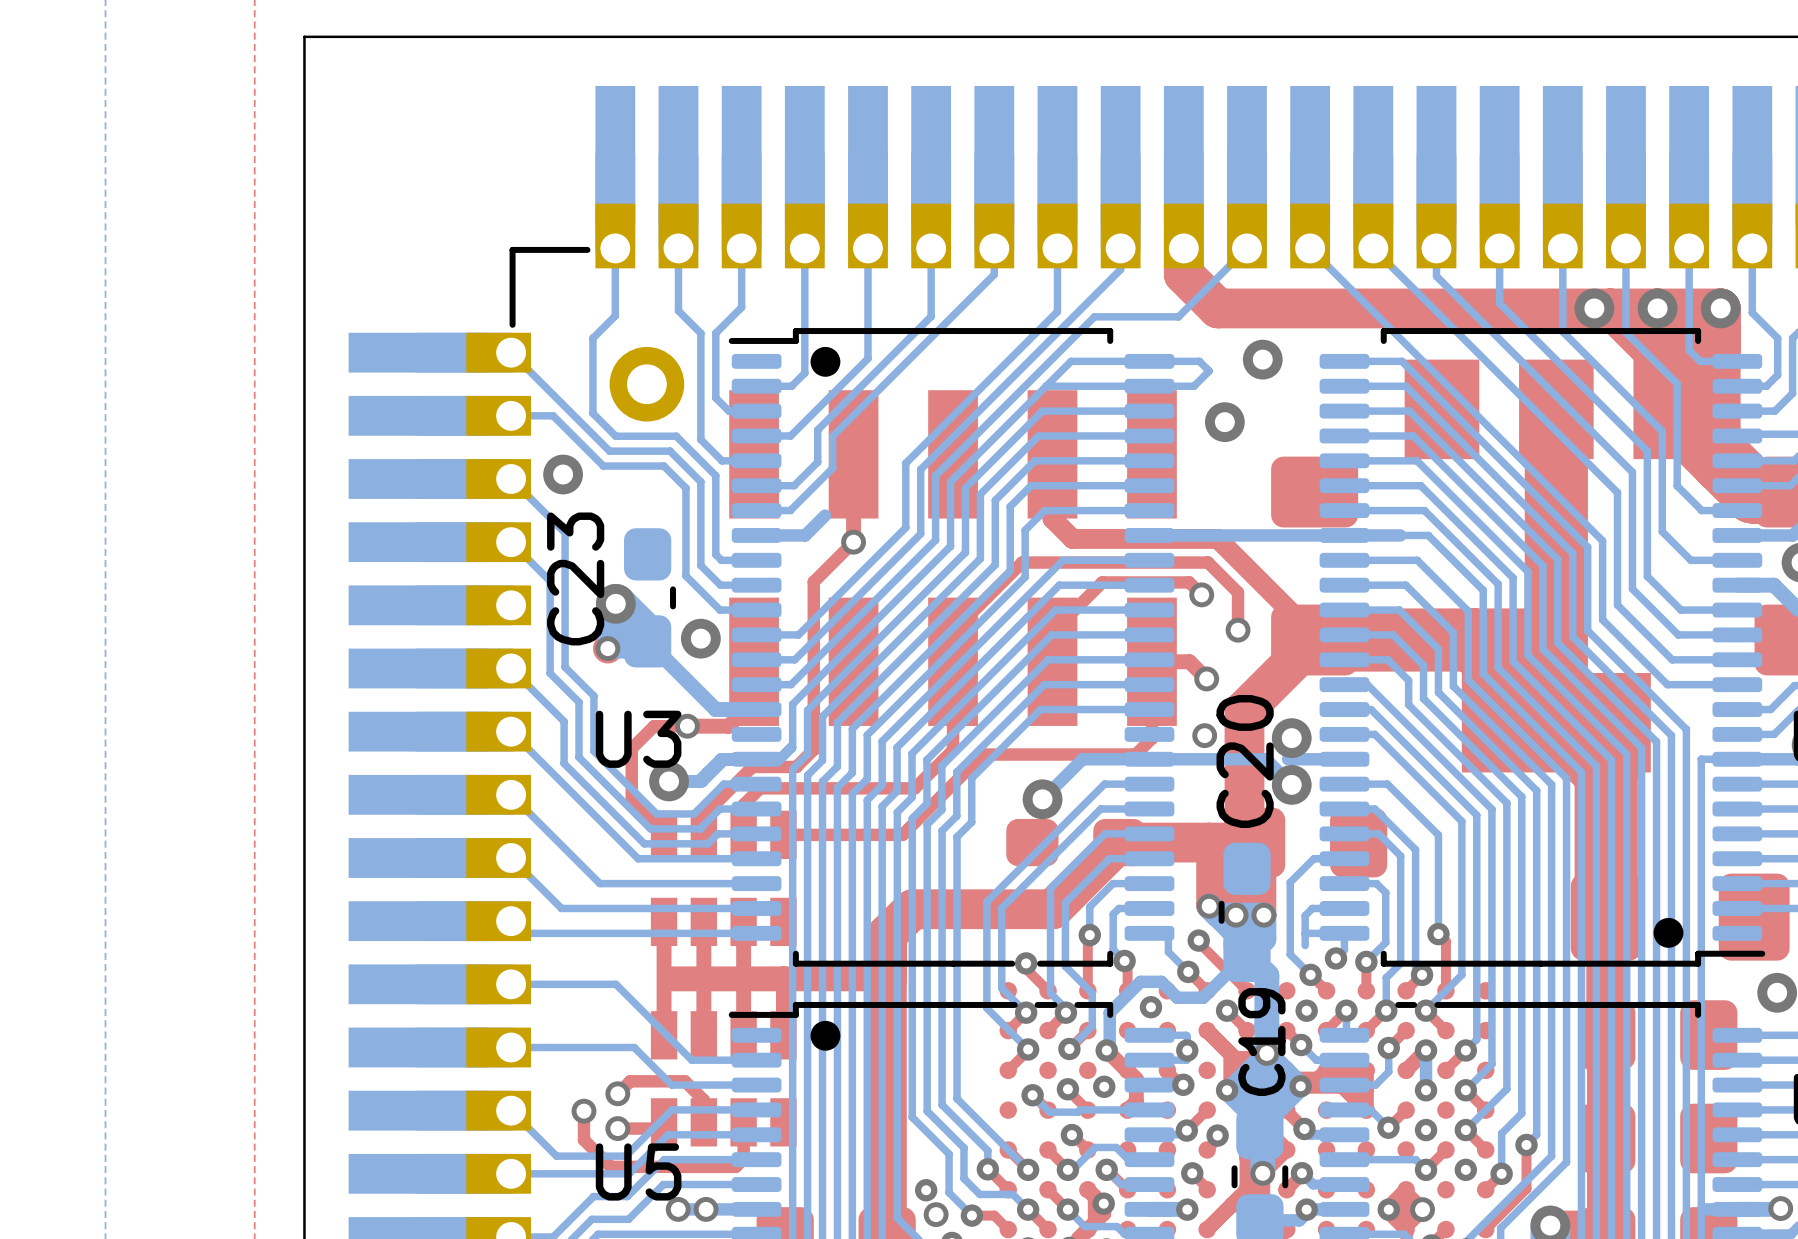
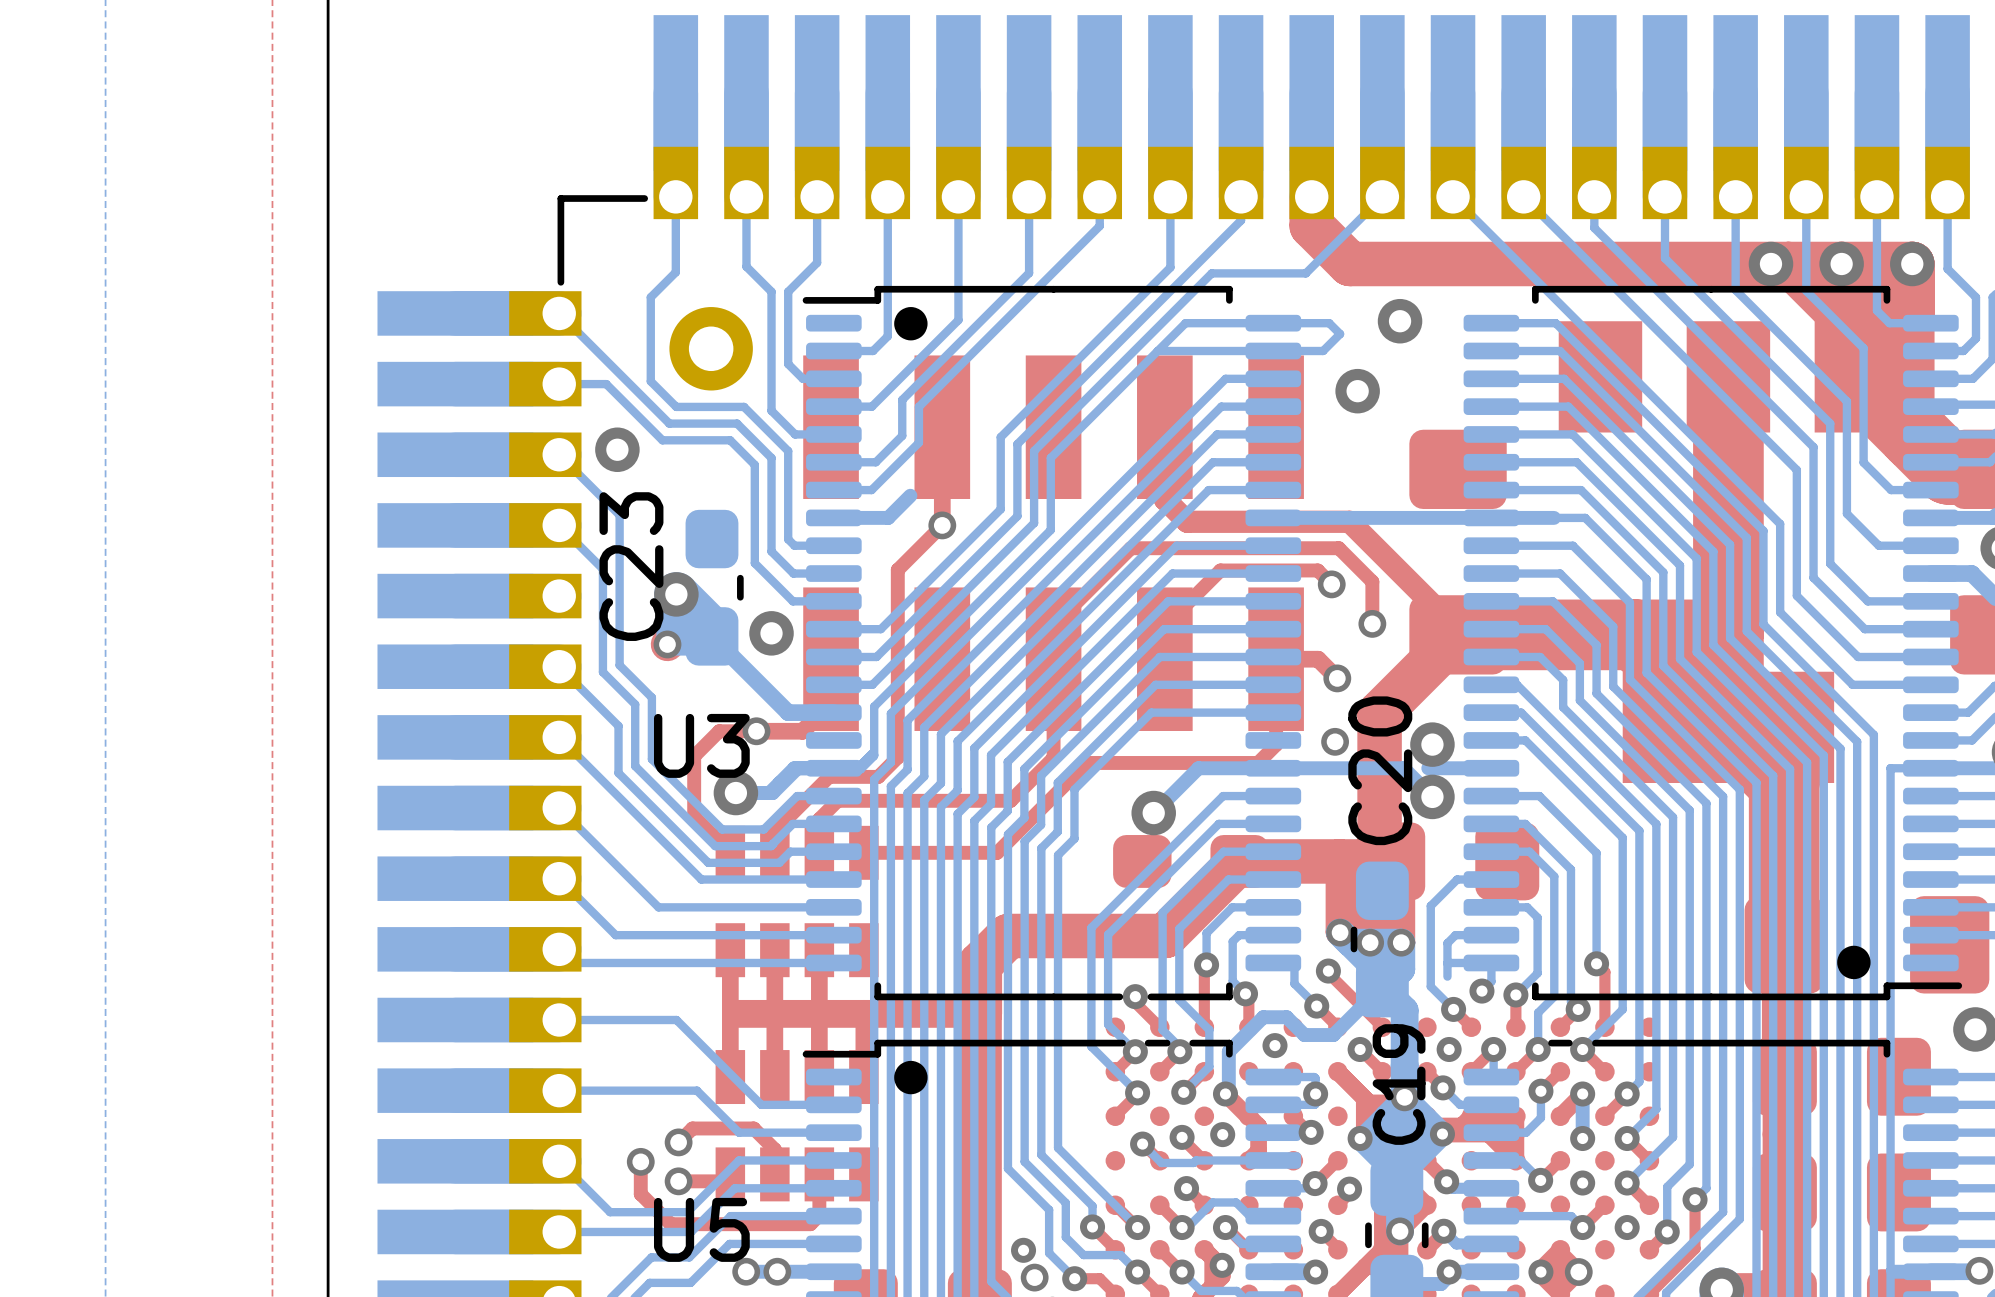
bottom track: (1106, 411) (1042, 411) (965, 488) (965, 552) -> (1225, 378) (1067, 536)
bottom track: (1103, 435) (1038, 435) (980, 494) (980, 558) -> (1221, 406) (1084, 543)
bottom track: (1099, 460) (1034, 460) (995, 500) (995, 564) -> (1217, 434) (1100, 550)
bottom track: (1095, 485) (1031, 485) (1010, 506) (1010, 571) -> (1212, 462) (1117, 557)
bottom track: (1091, 510) (1044, 510) (1025, 530) (1025, 577) -> (1208, 490) (1134, 564)

